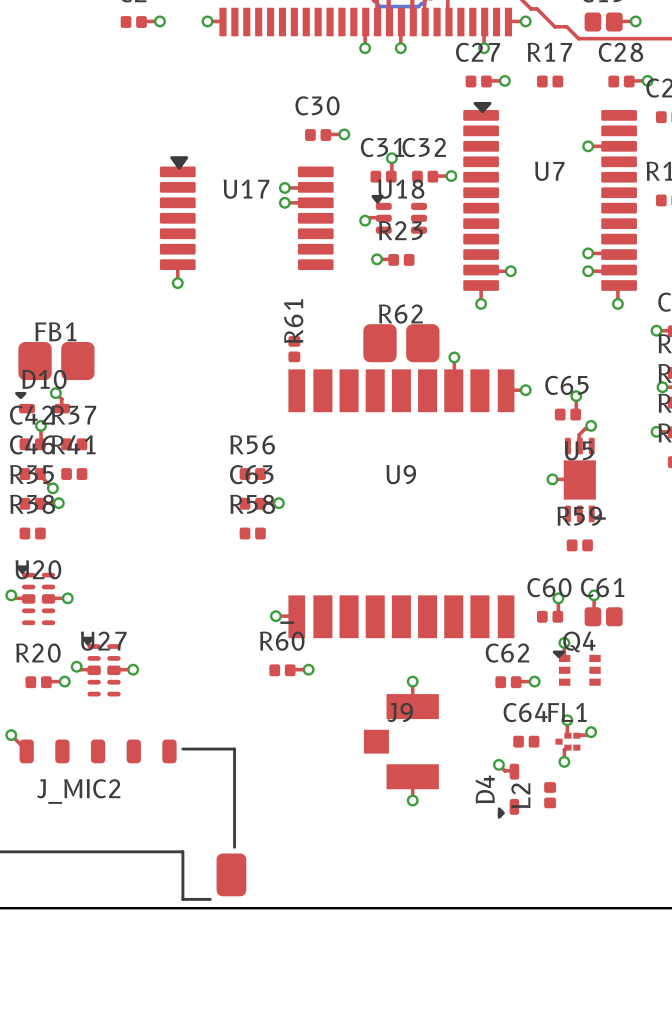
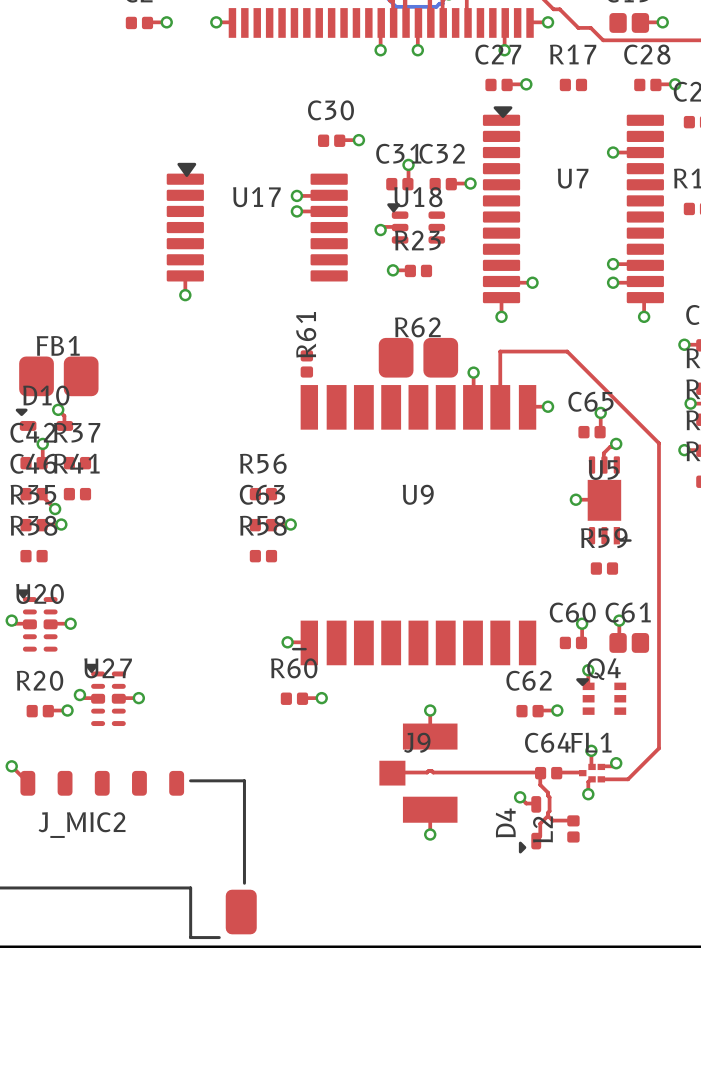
top track: none -> (500, 407) (500, 351) (567, 351) (658, 443) (658, 748) (627, 779) (601, 779)
top track: none -> (393, 772) (428, 770) (540, 772) (540, 784) (548, 792) (549, 797) (548, 815)
top track: none -> (557, 772) (582, 772)
top track: none -> (548, 815) (540, 823) (540, 836) (535, 840)
top track: none -> (548, 815) (552, 820) (572, 820)

